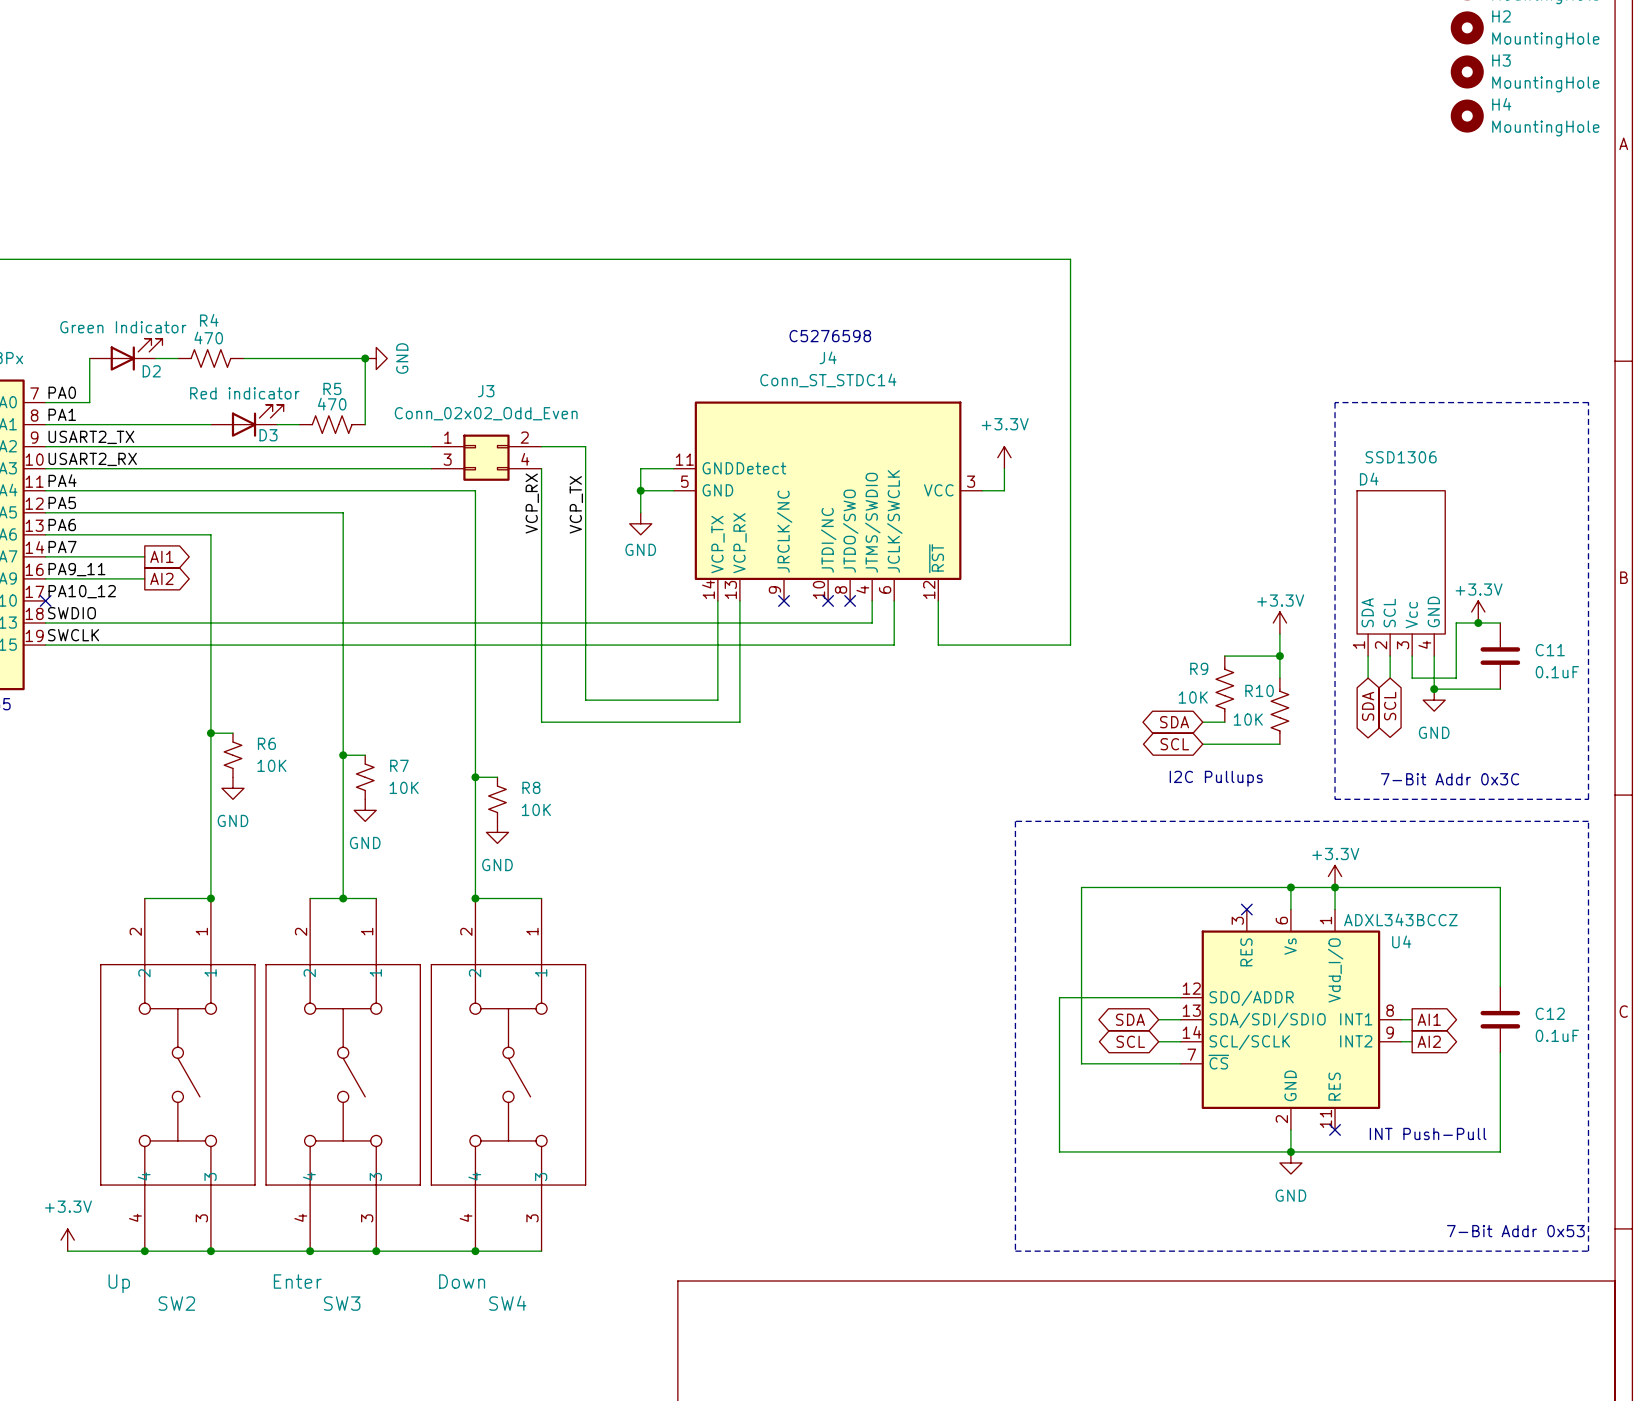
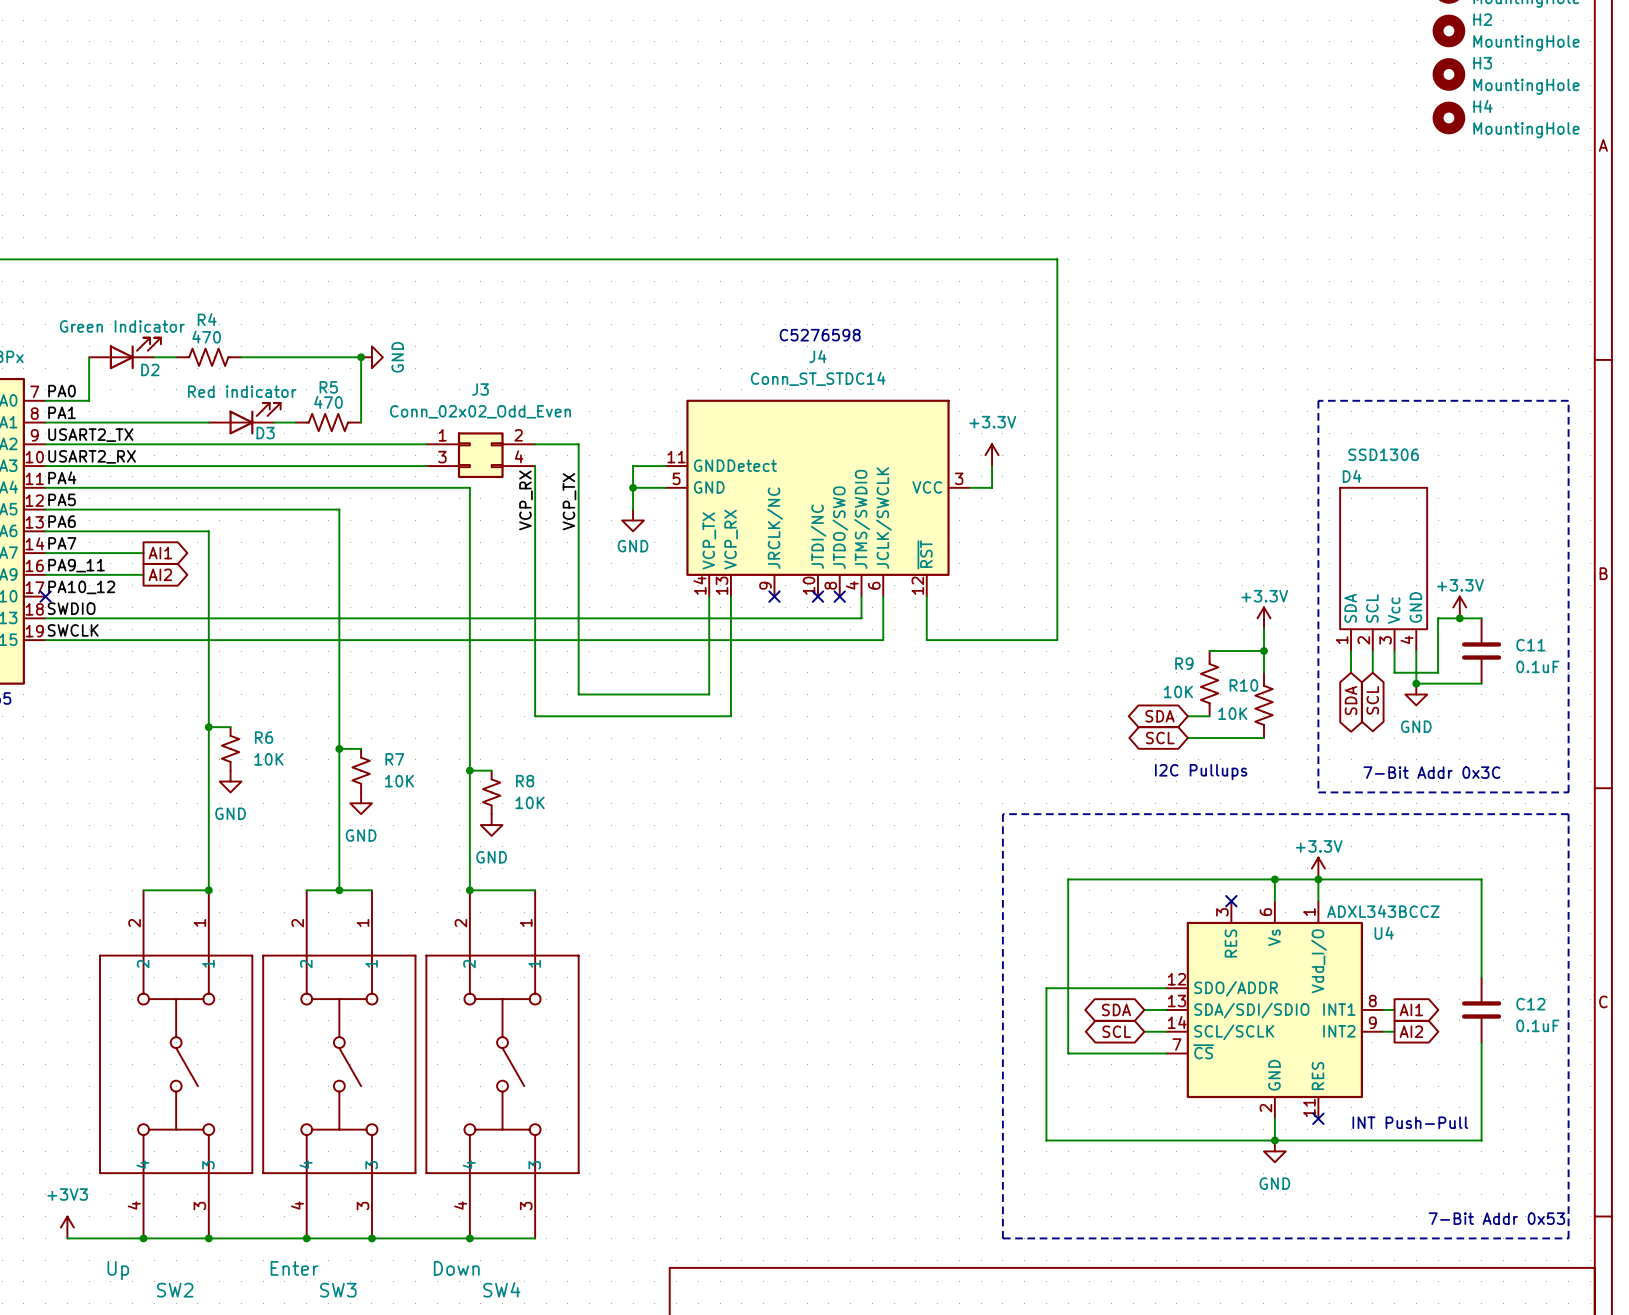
power symbol: +3.3V (67, 1240) -> +3V3 (67, 1227)

